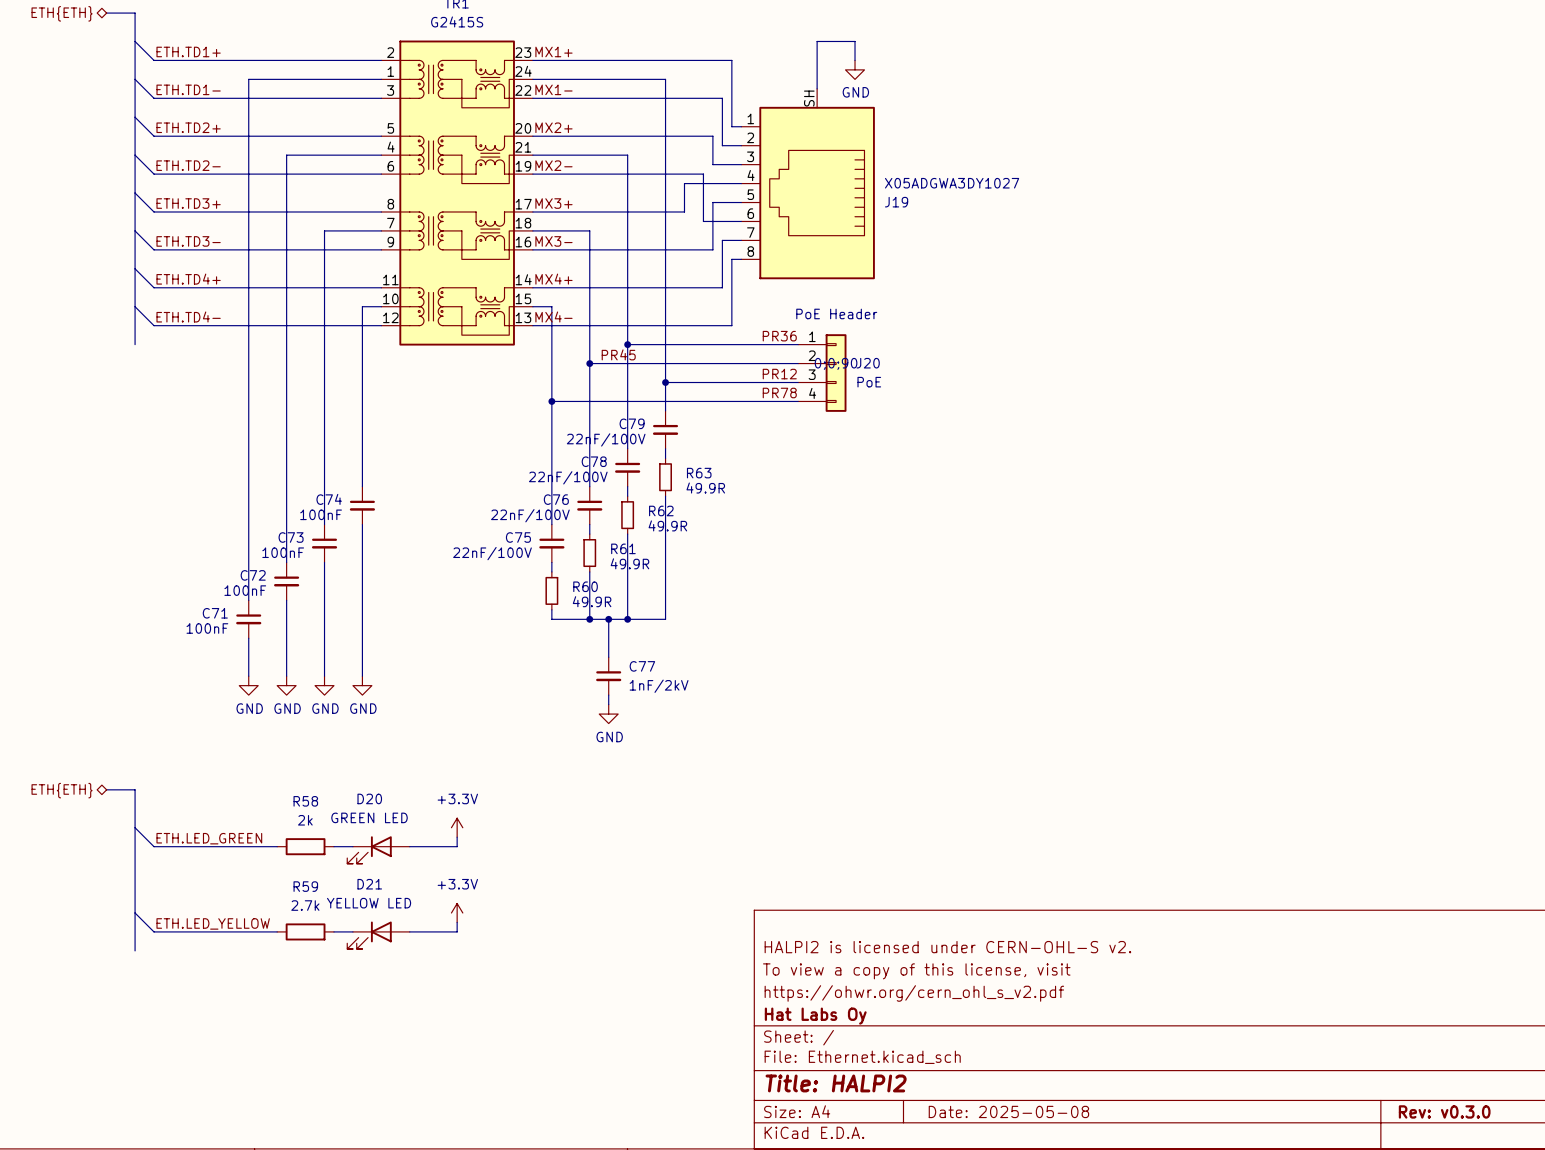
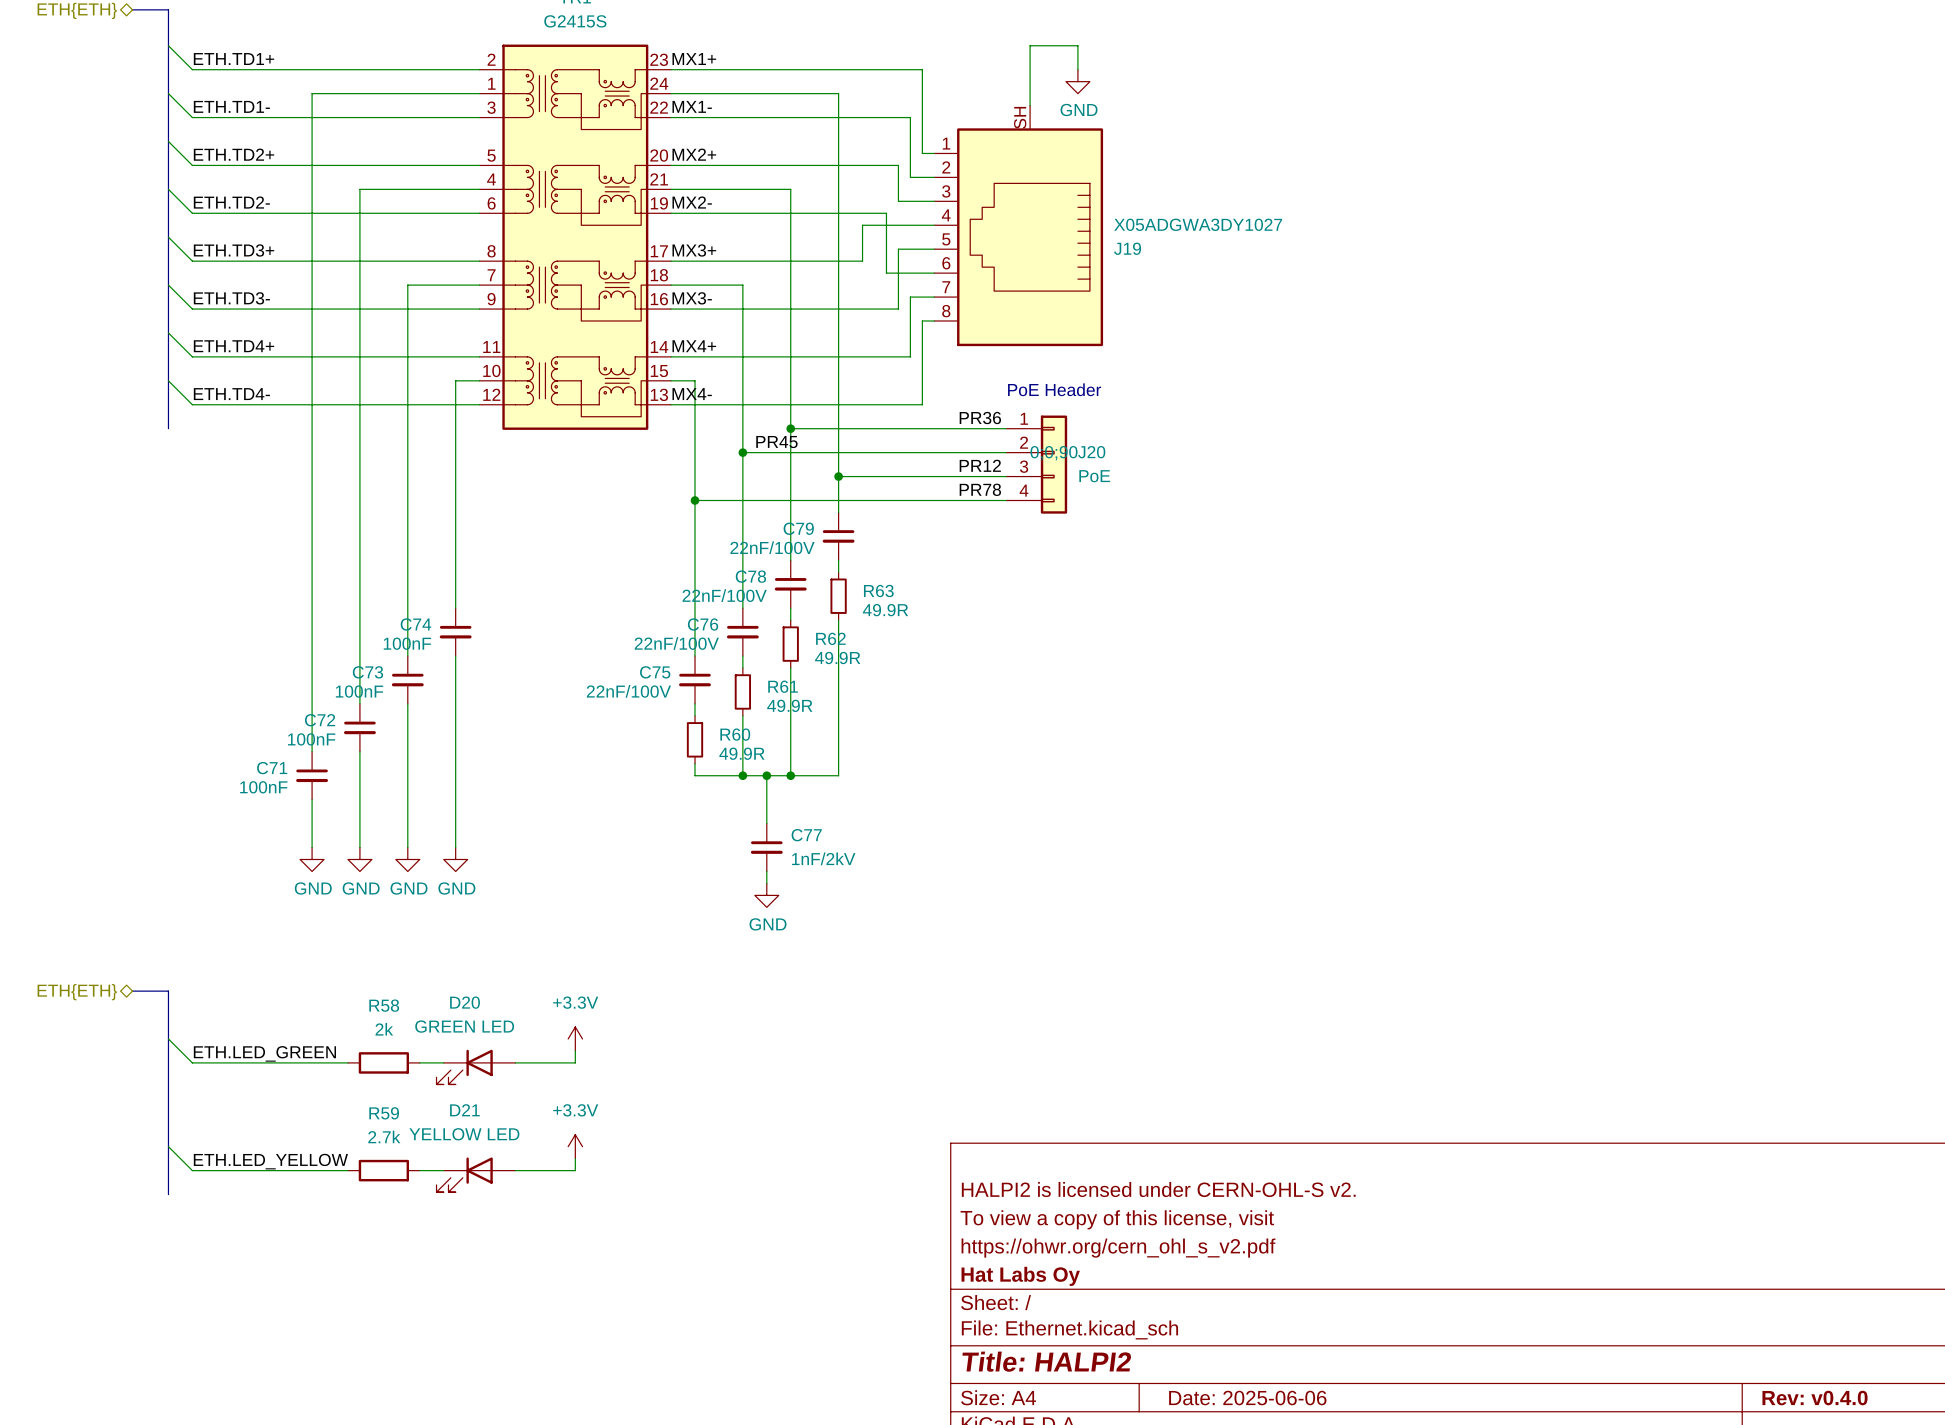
title block: Date: 2025-05-08 (1008, 1111) -> Date: 2025-06-06 (1247, 1398)
title block: Rev: v0.3.0 (1444, 1111) -> Rev: v0.4.0 (1815, 1398)

